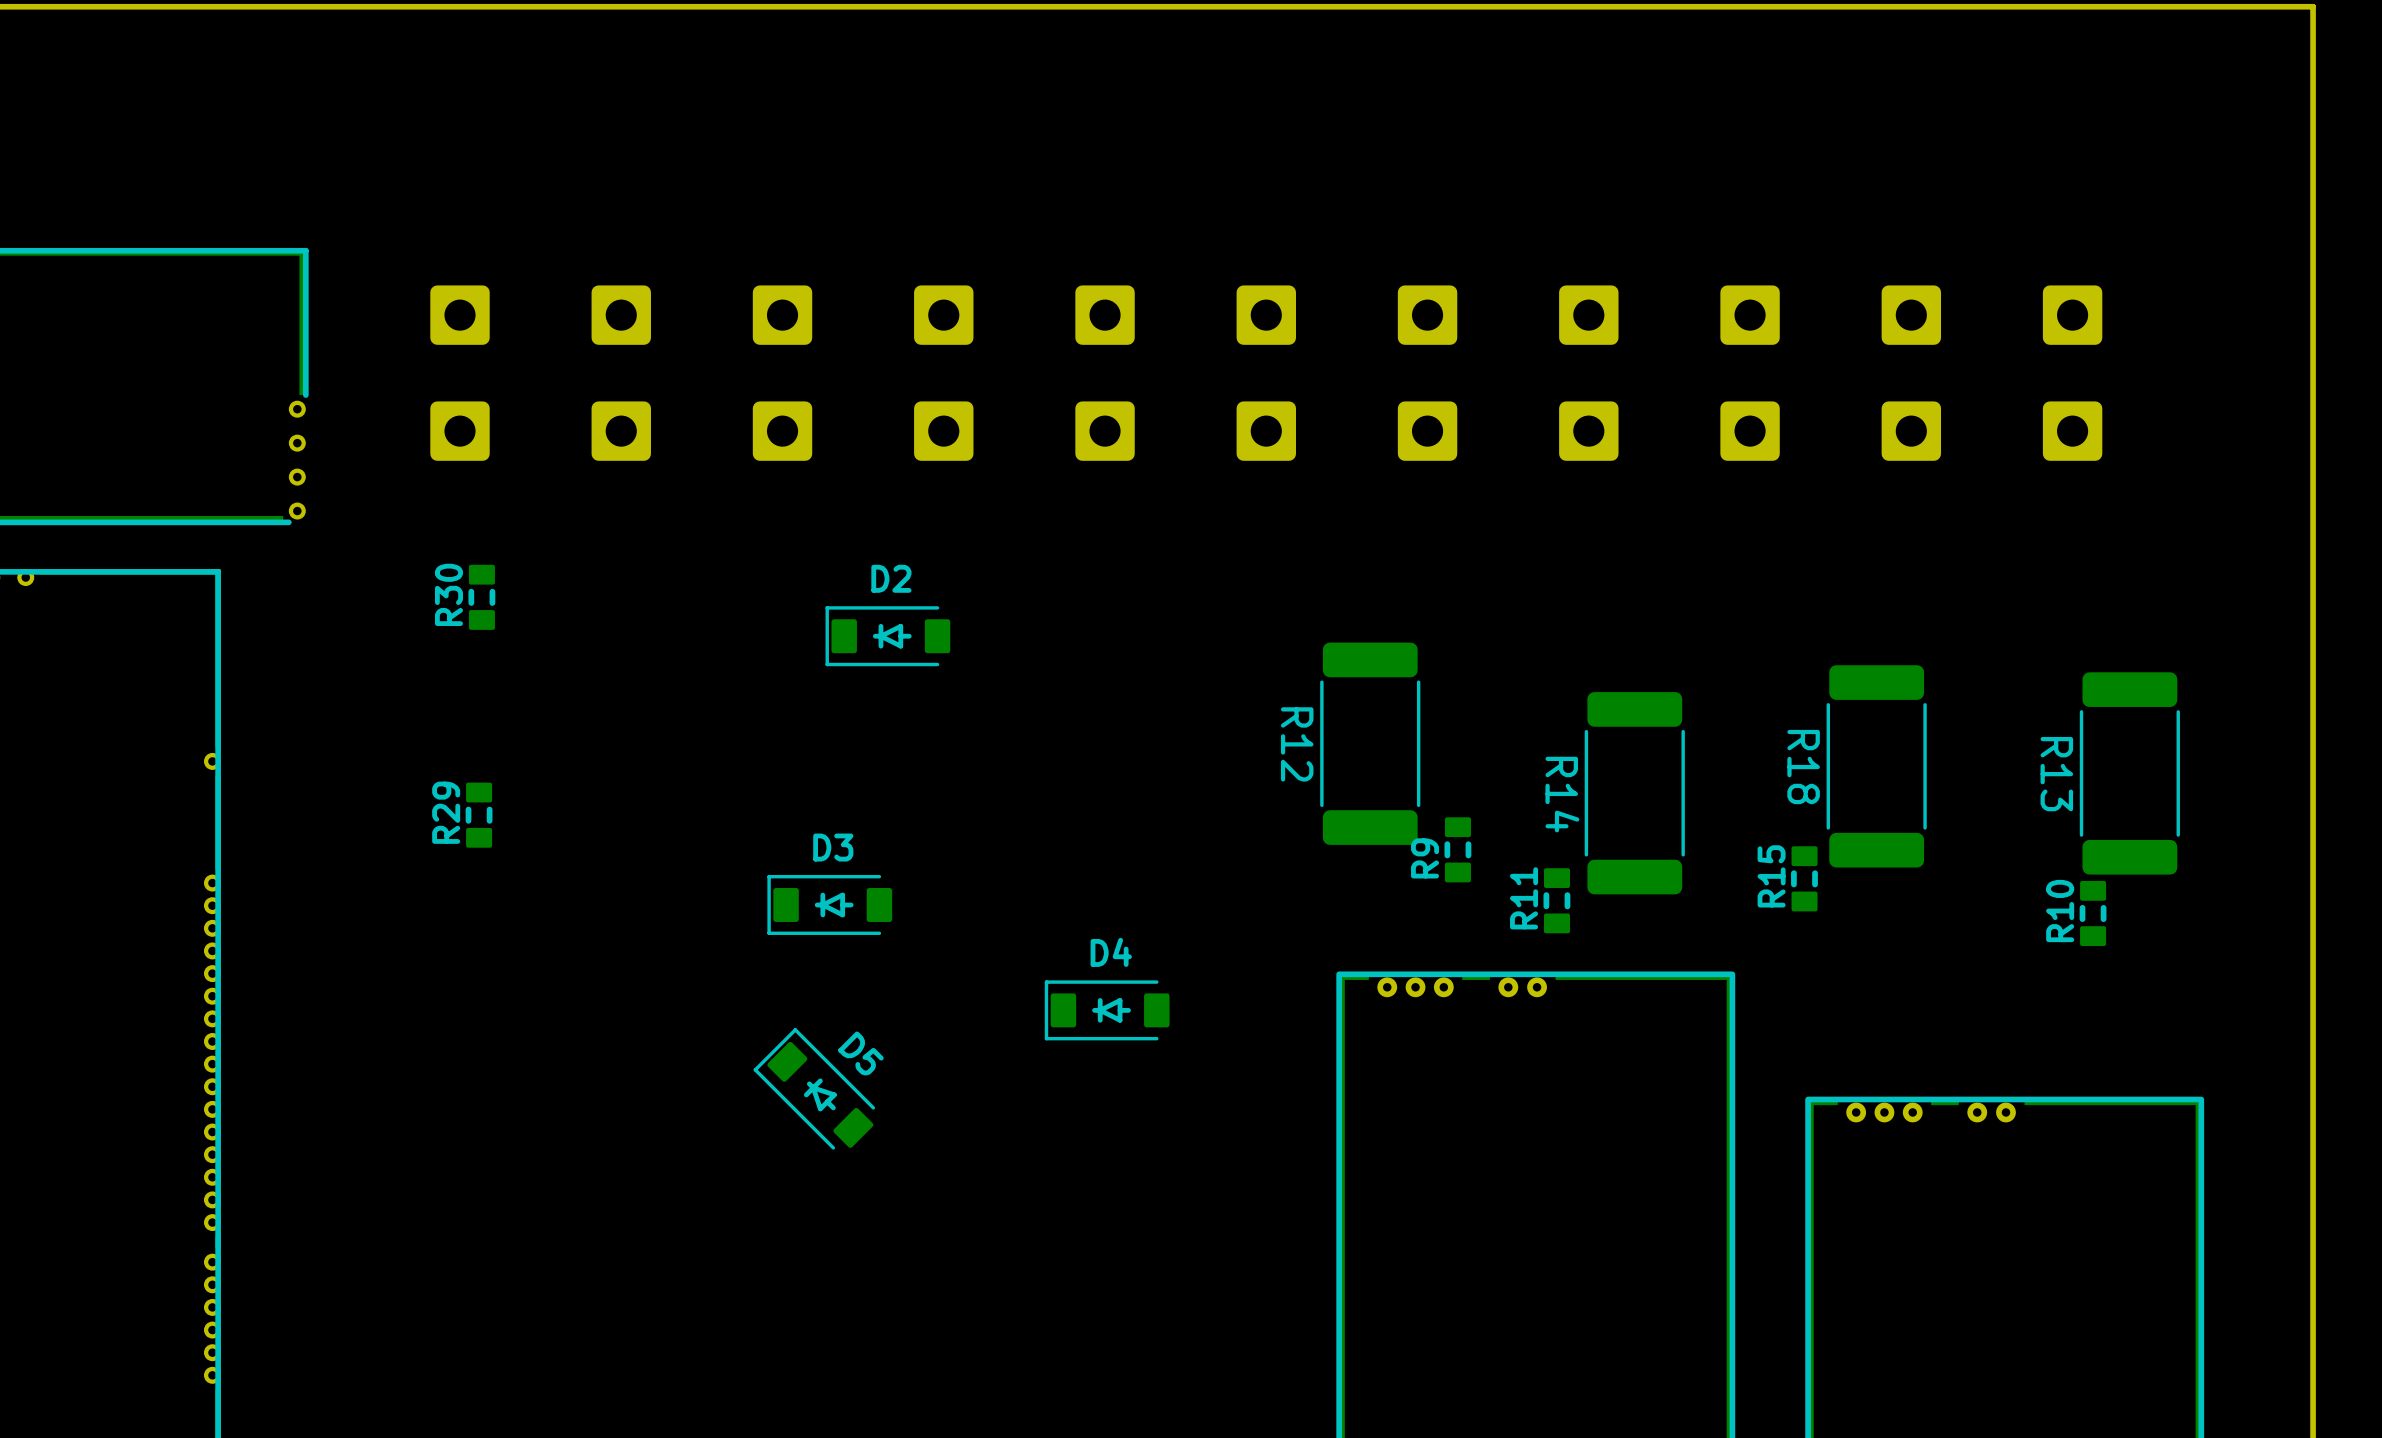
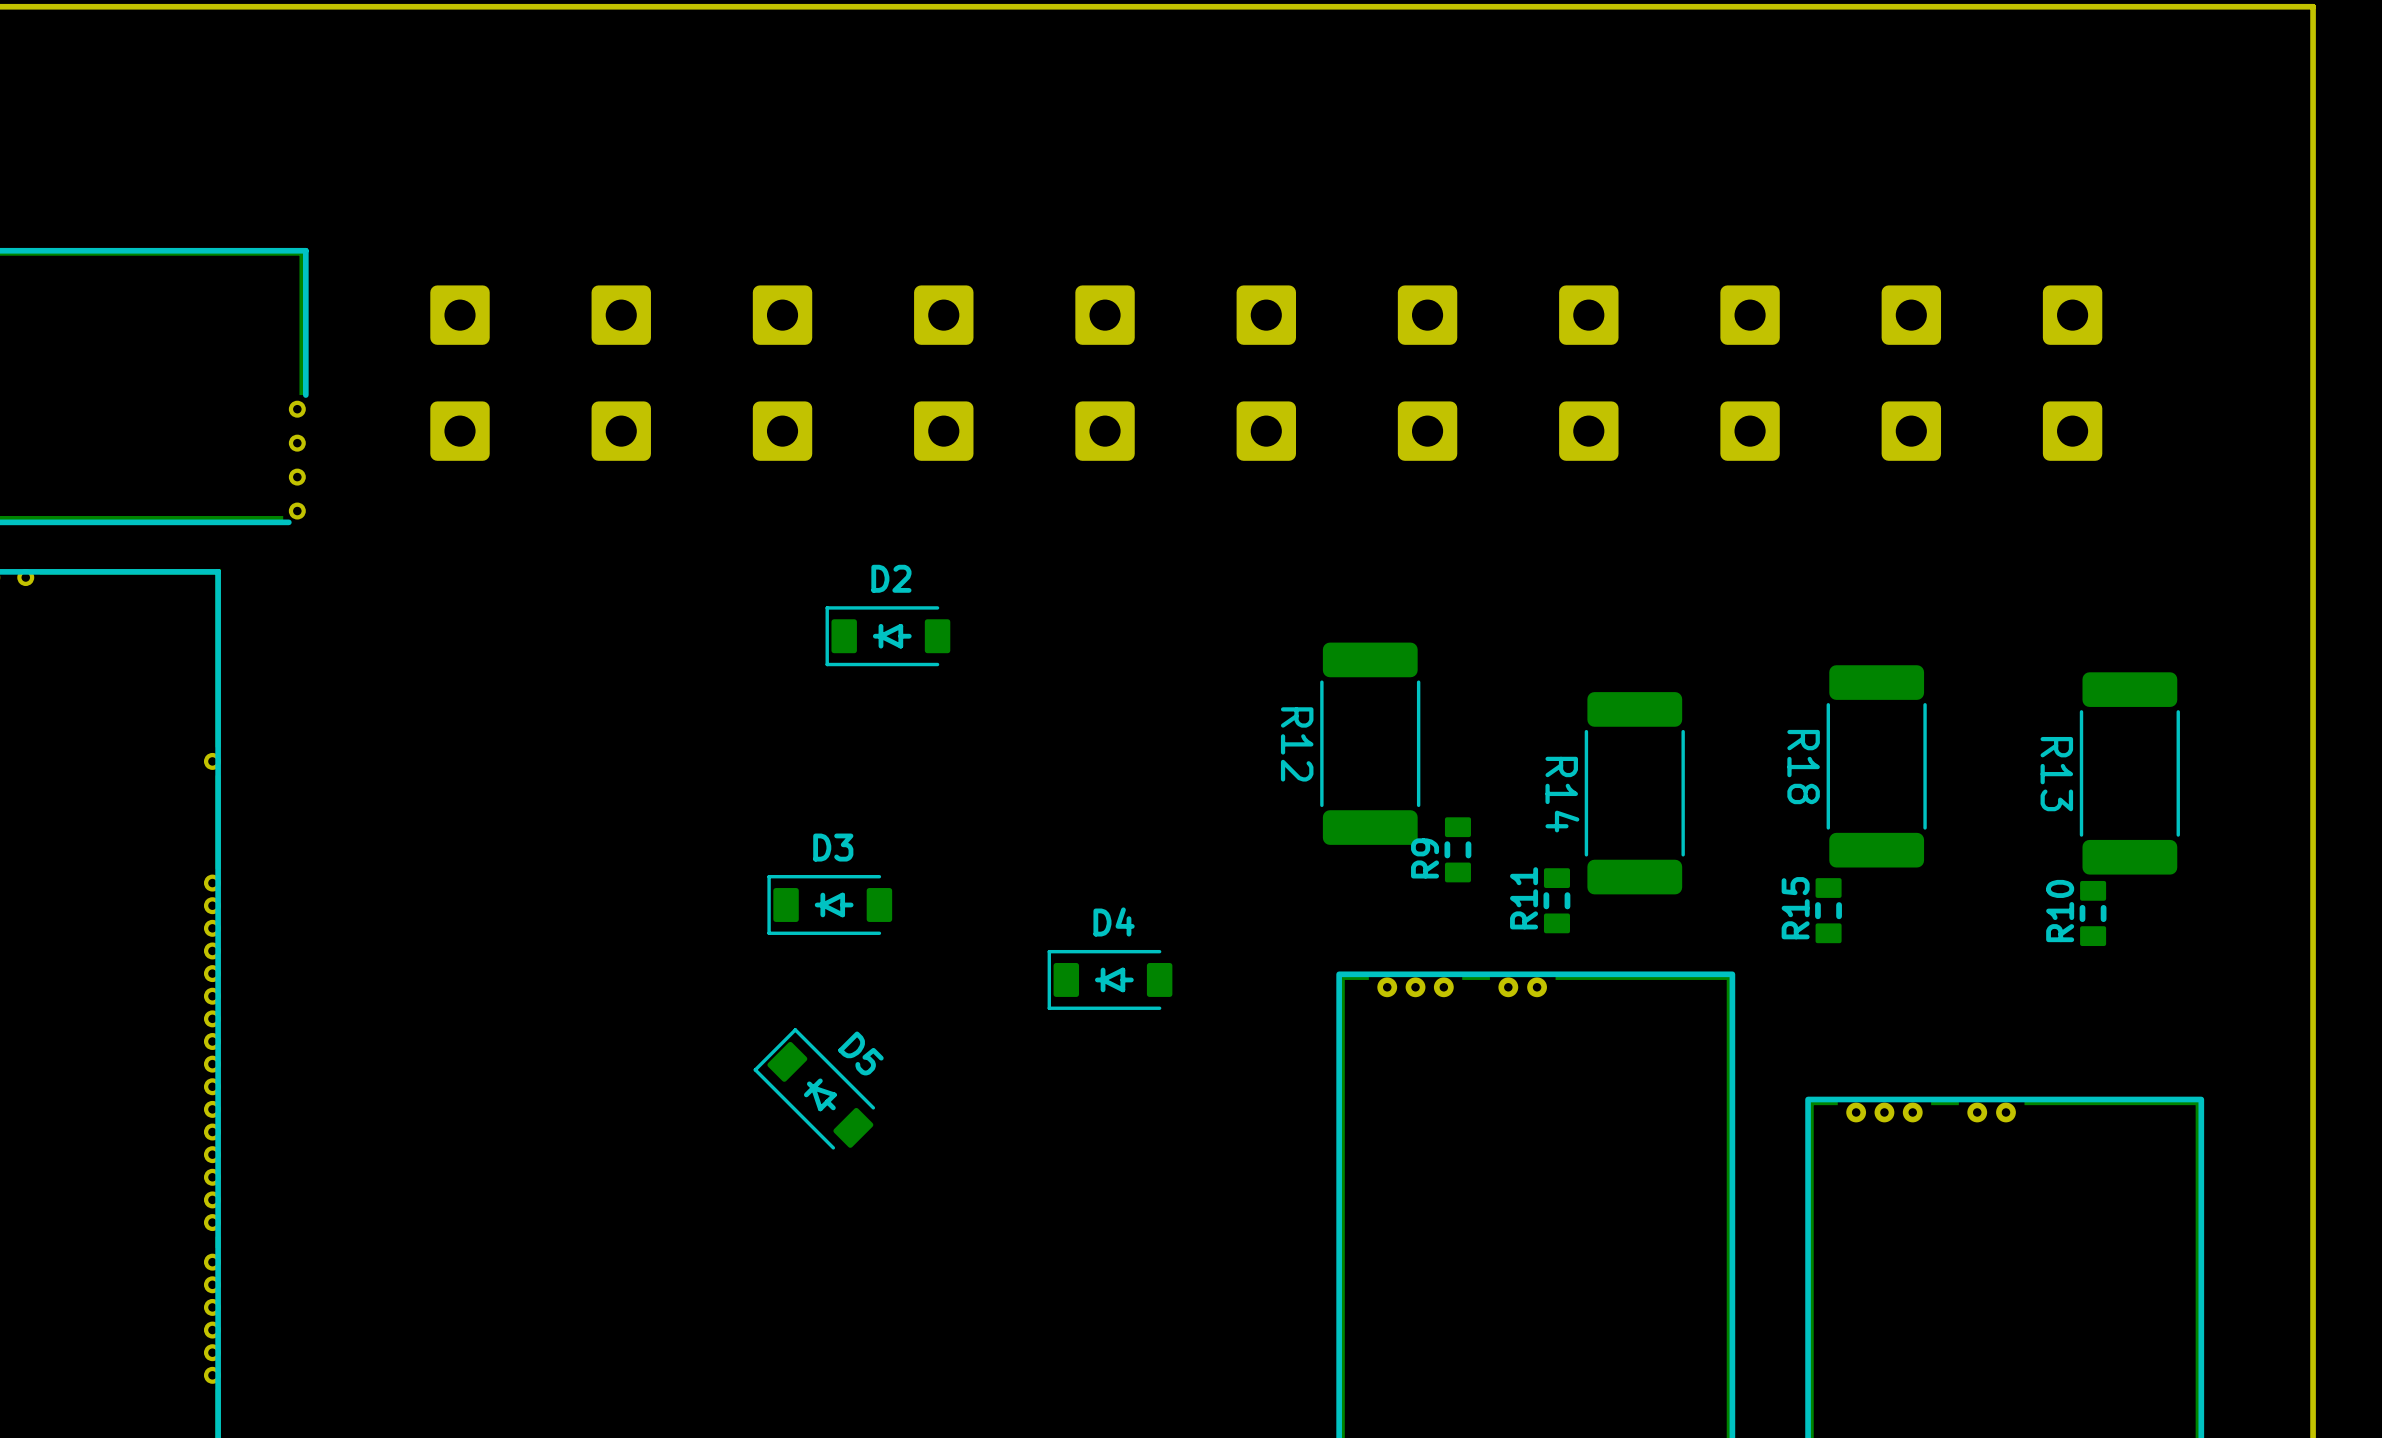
R30: (481, 597) -> none
R29: (479, 815) -> none
R15 position: (1804, 878) -> (1828, 910)
D4 position: (1107, 1010) -> (1109, 979)

